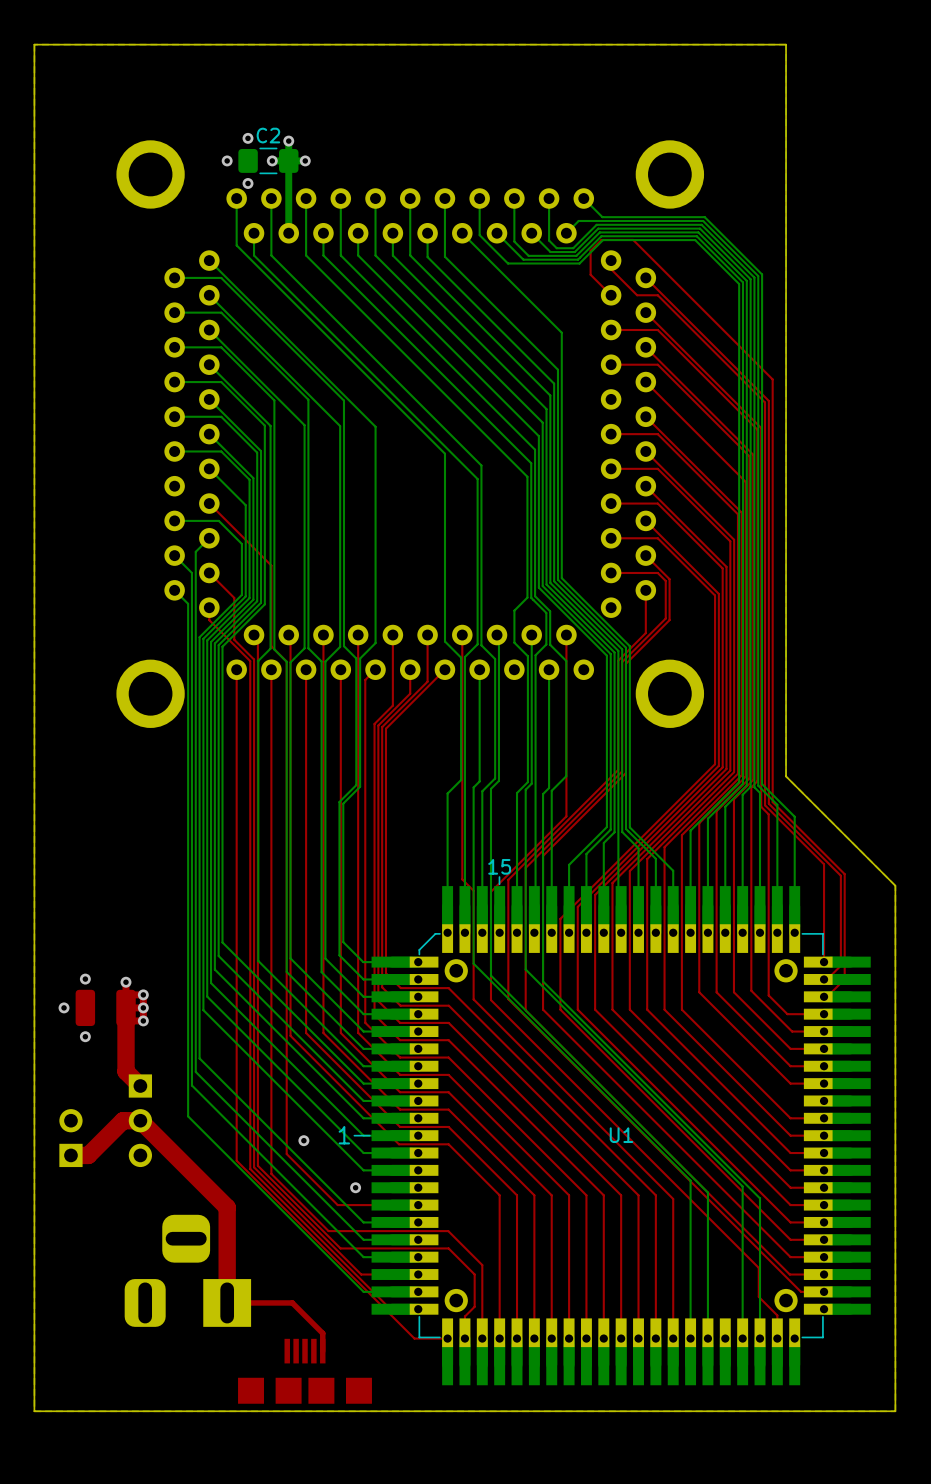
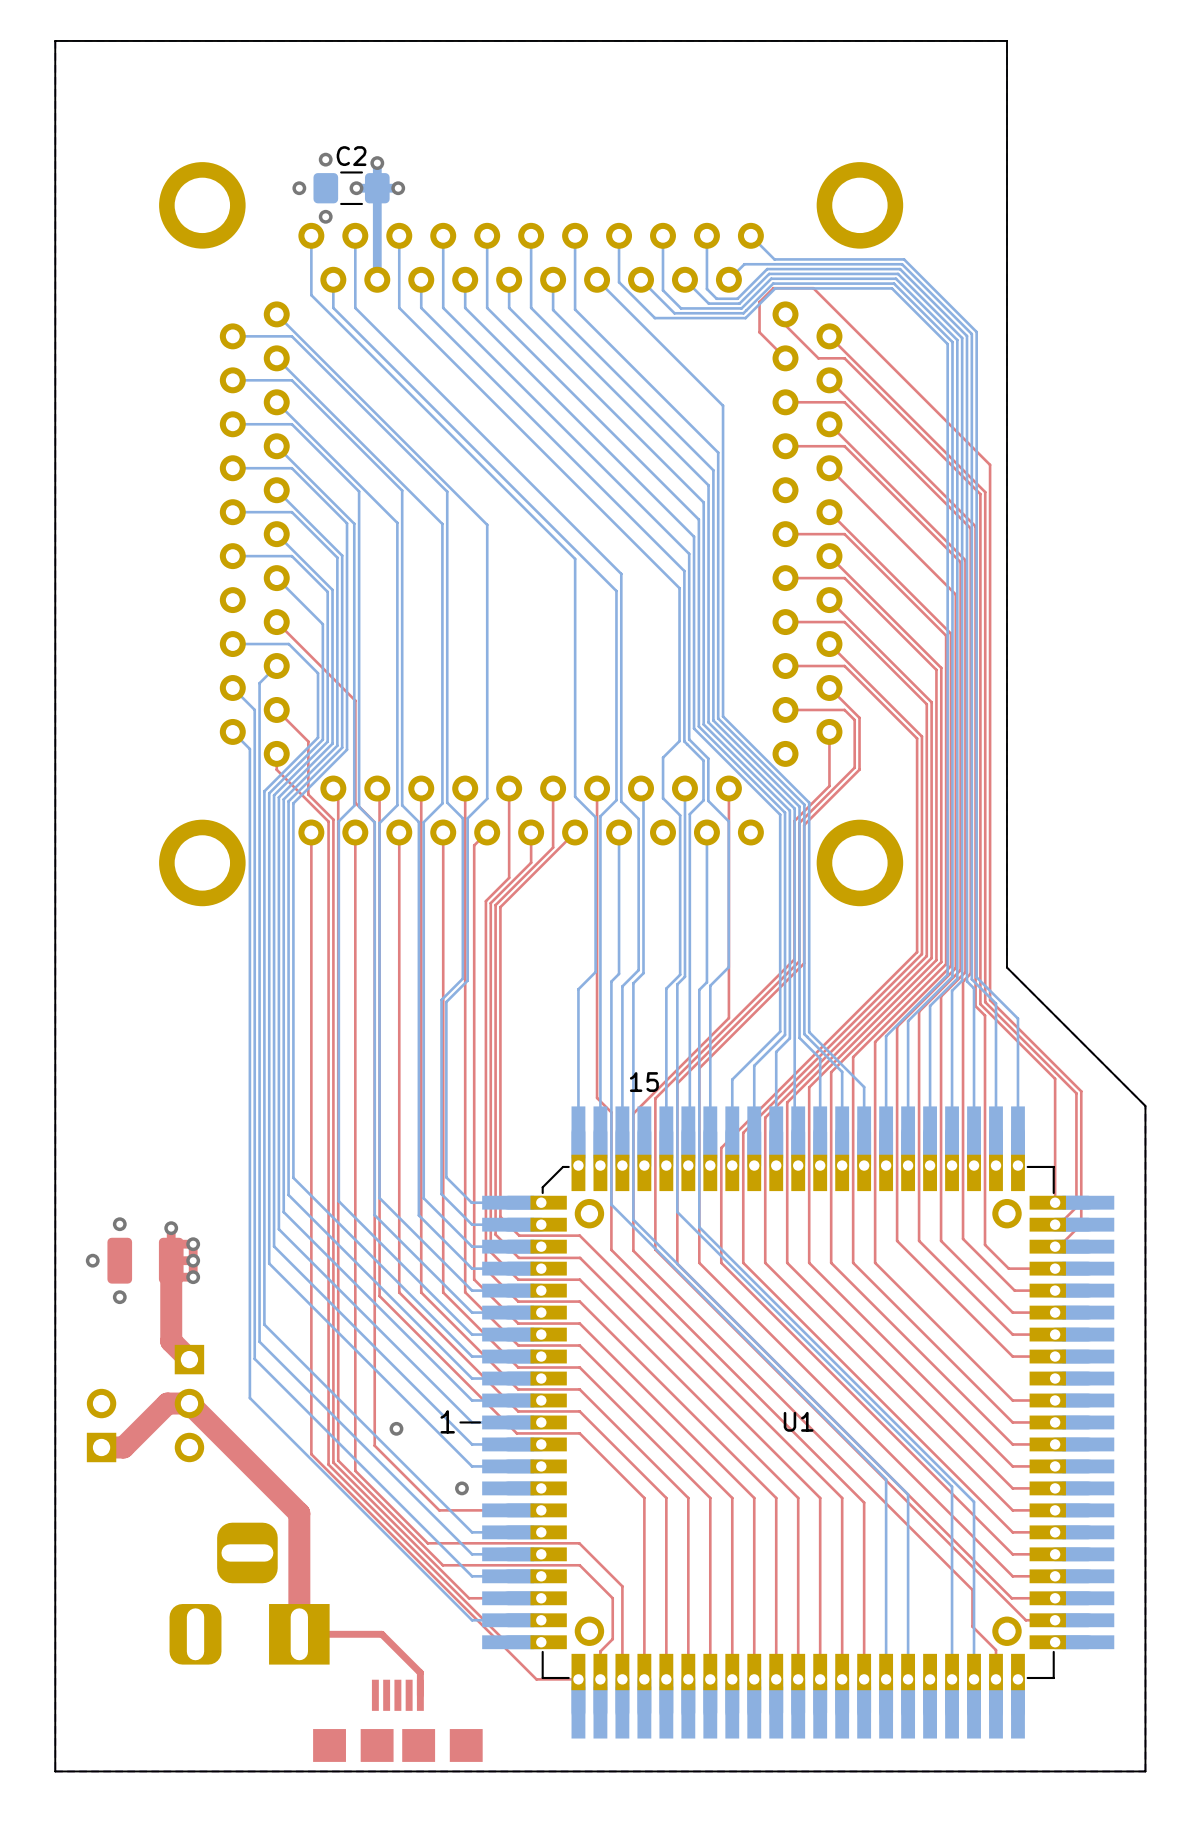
line: (499, 877) (499, 884) -> none

